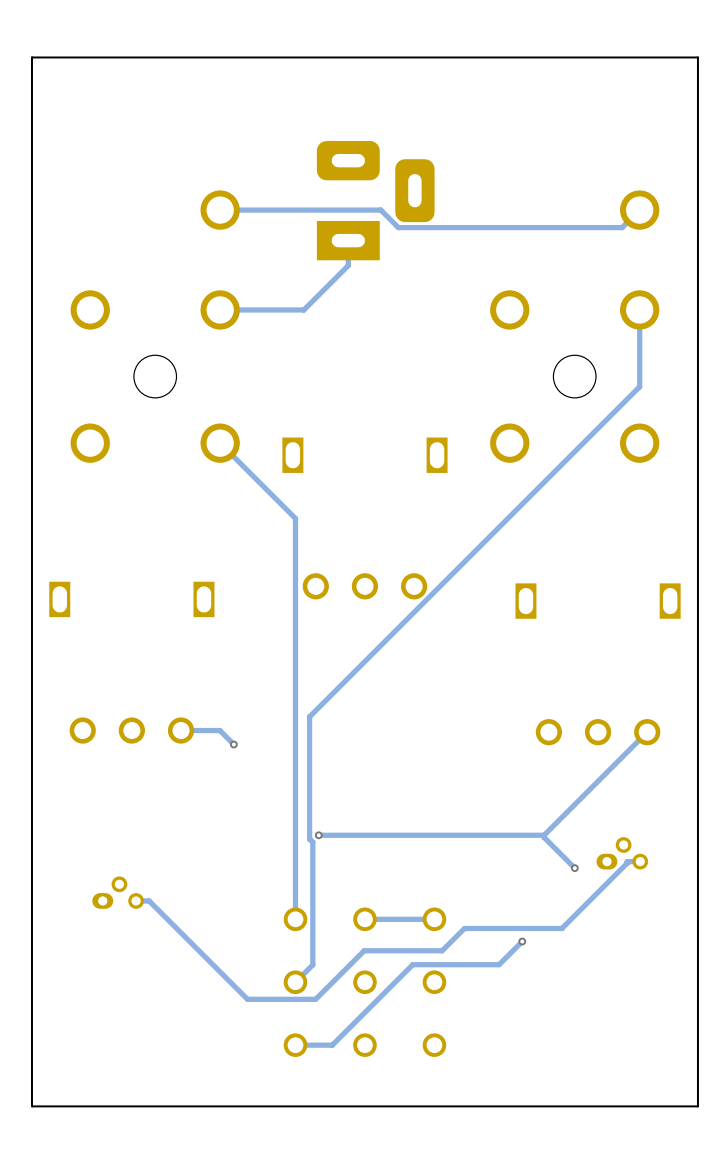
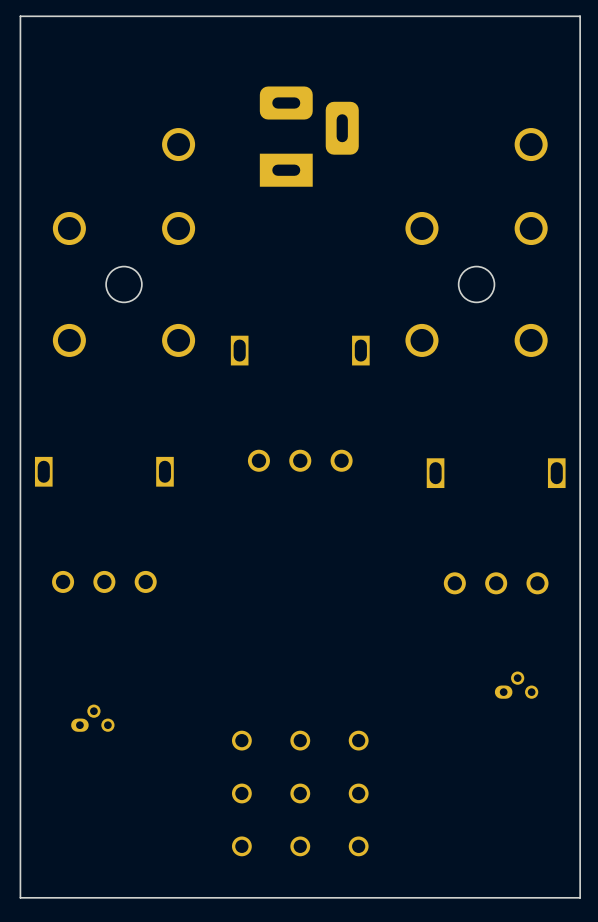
track: (639, 210) (622, 227) (398, 227) (380, 210) (220, 210) -> none
track: (348, 240) (348, 265) (303, 309) (220, 309) -> none
track: (639, 309) (639, 386) (309, 716) (309, 839) (312, 842) (312, 964) (295, 982) -> none
track: (220, 443) (295, 518) (295, 919) -> none
track: (181, 730) (219, 730) (233, 744) -> none
track: (647, 732) (544, 835) -> none
via: (233, 744) -> none
via: (318, 835) -> none
track: (544, 835) (574, 868) -> none
track: (544, 835) (318, 835) -> none
track: (640, 861) (627, 861) (561, 928) (464, 928) (442, 950) (364, 950) (315, 999) (247, 999) (149, 900) (136, 900) -> none
via: (574, 868) -> none
track: (434, 919) (364, 919) -> none
track: (522, 941) (499, 964) (412, 964) (332, 1045) (295, 1045) -> none
via: (522, 941) -> none

